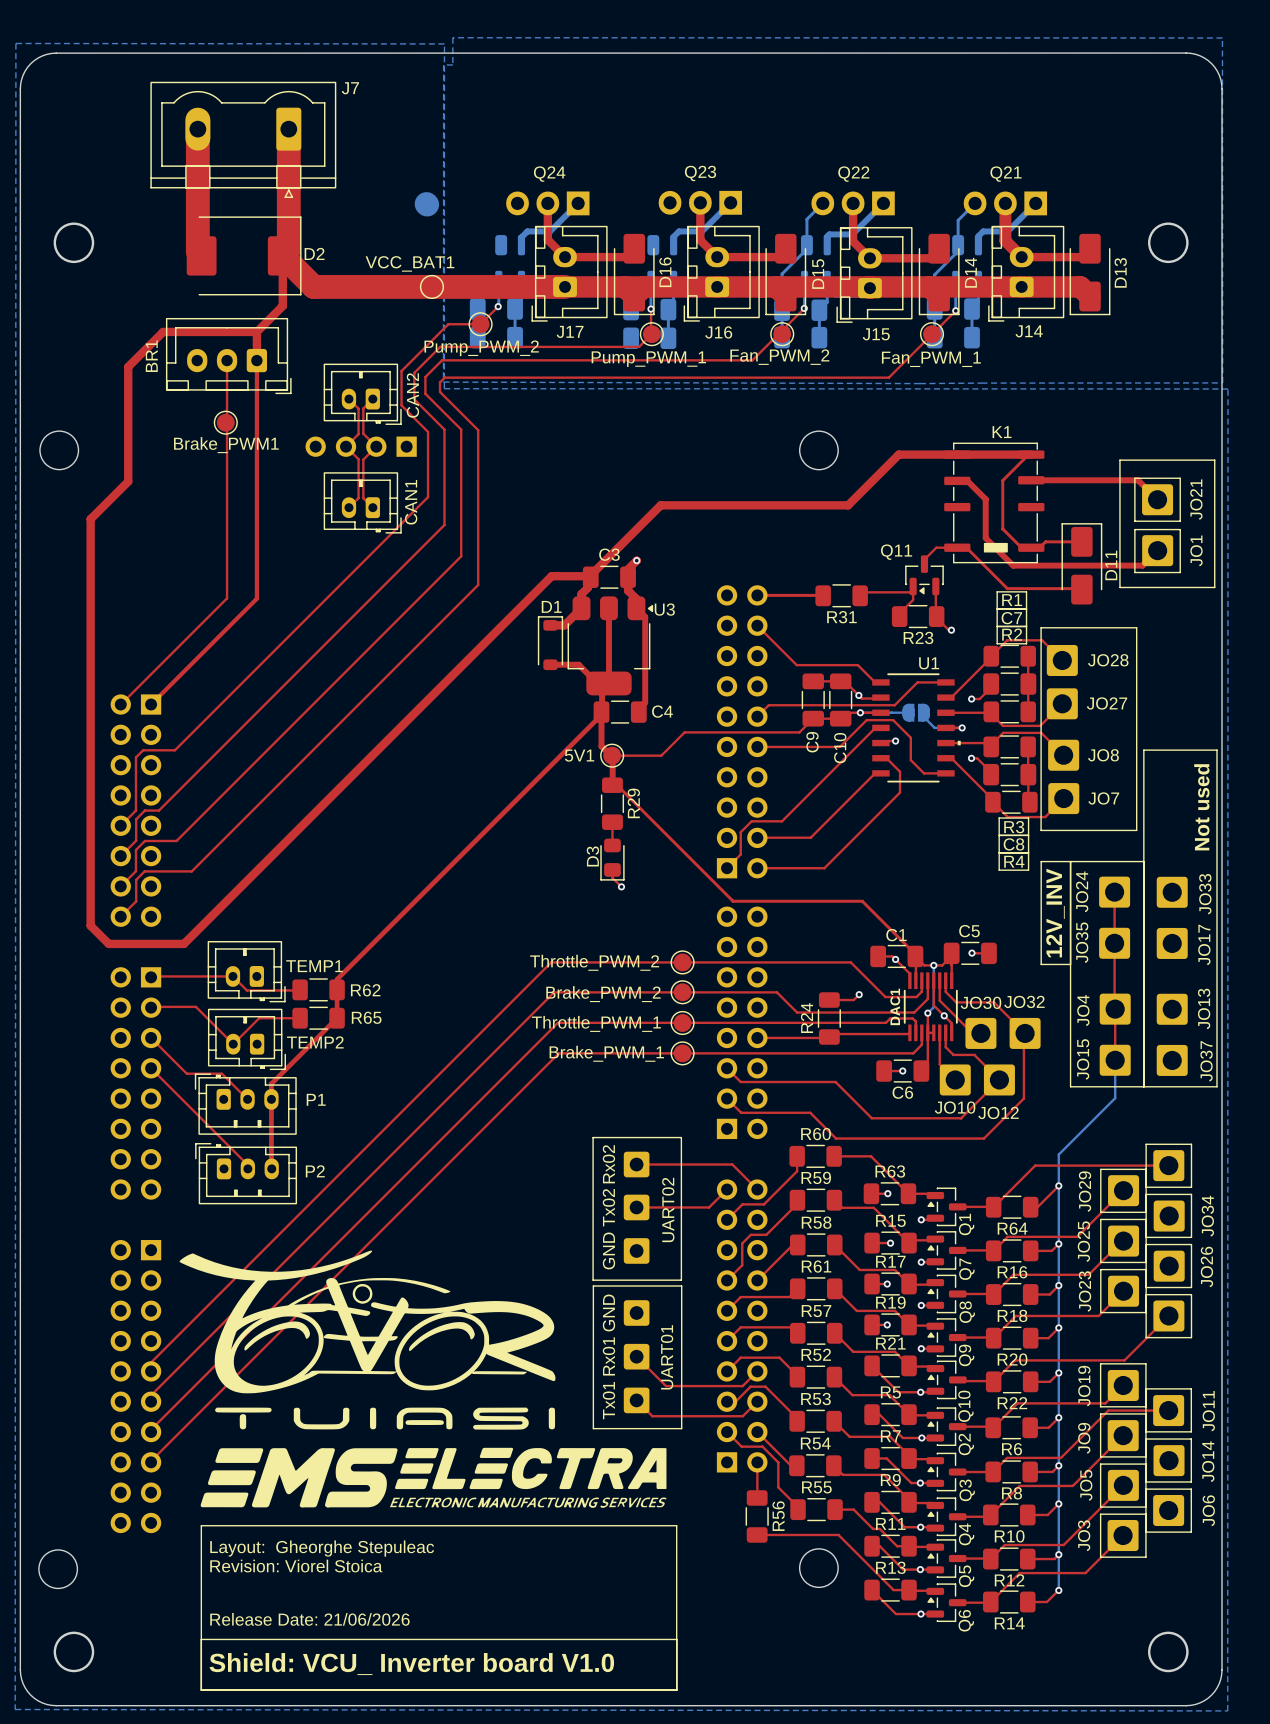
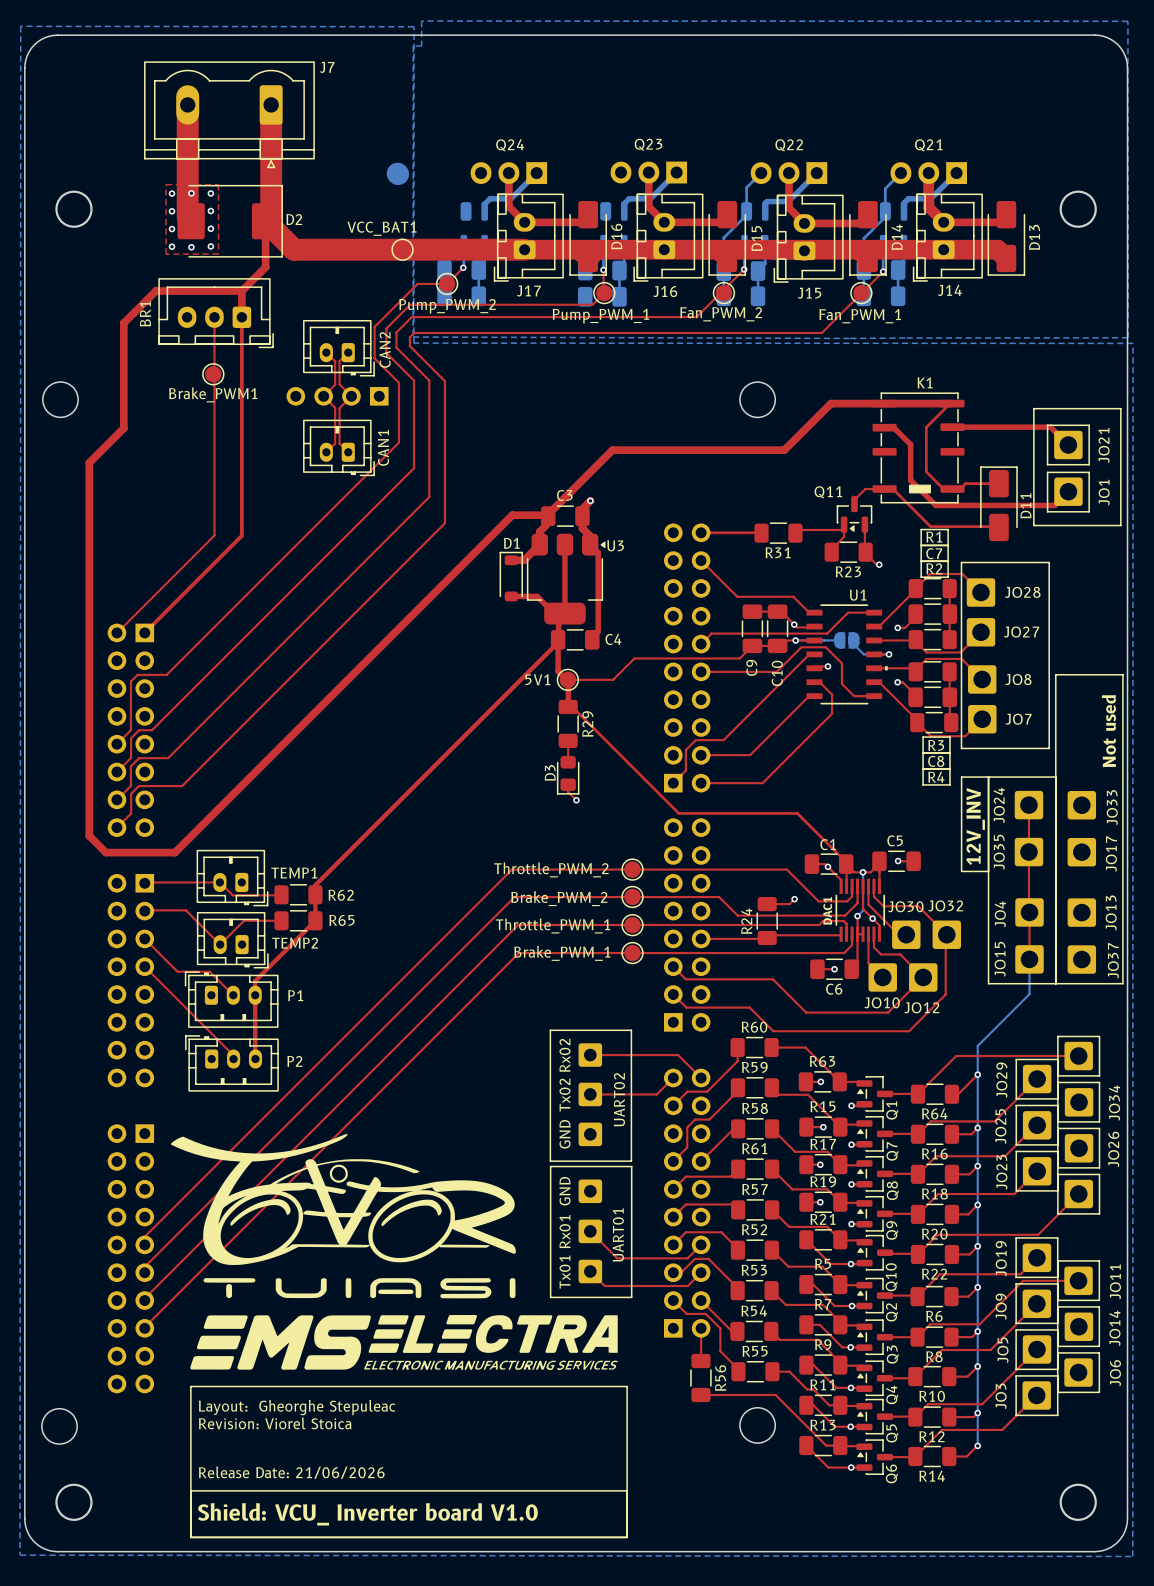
top zone outline: none -> (165, 184) (218, 184) (218, 253) (166, 254) (165, 184)
via: none -> (171, 193)
via: none -> (191, 193)
via: none -> (210, 193)
via: none -> (210, 211)
via: none -> (171, 211)
via: none -> (171, 229)
via: none -> (210, 228)
via: none -> (171, 246)
via: none -> (210, 246)
via: none -> (191, 247)

